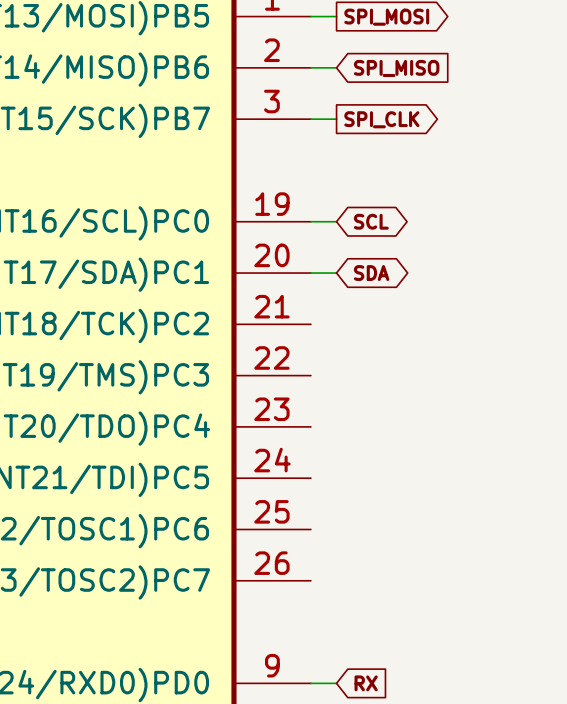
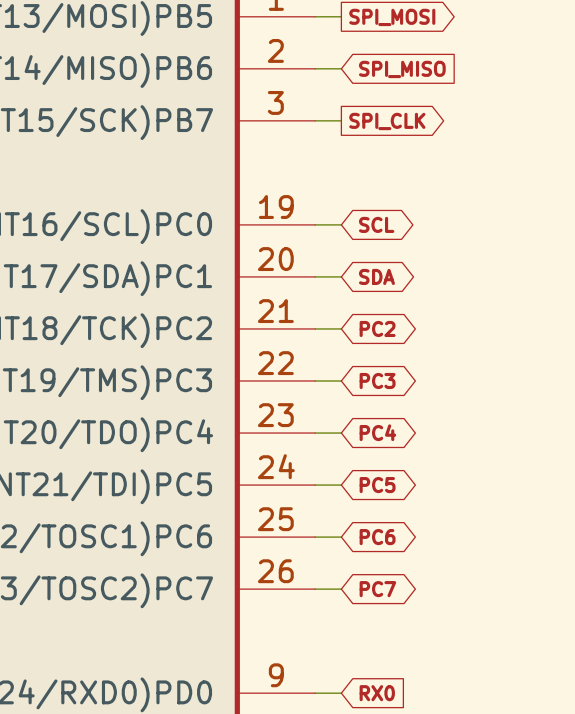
wire: none -> (315, 328) (341, 328)
global label: none -> PC2 (377, 328)
wire: none -> (315, 381) (341, 381)
global label: none -> PC3 (377, 381)
wire: none -> (315, 433) (341, 433)
global label: none -> PC4 (377, 432)
wire: none -> (315, 485) (341, 485)
global label: none -> PC5 (377, 485)
wire: none -> (315, 537) (341, 537)
global label: none -> PC6 (377, 537)
wire: none -> (315, 589) (341, 589)
global label: none -> PC7 (377, 589)
global label: RX (366, 683) -> RX0 (377, 693)

